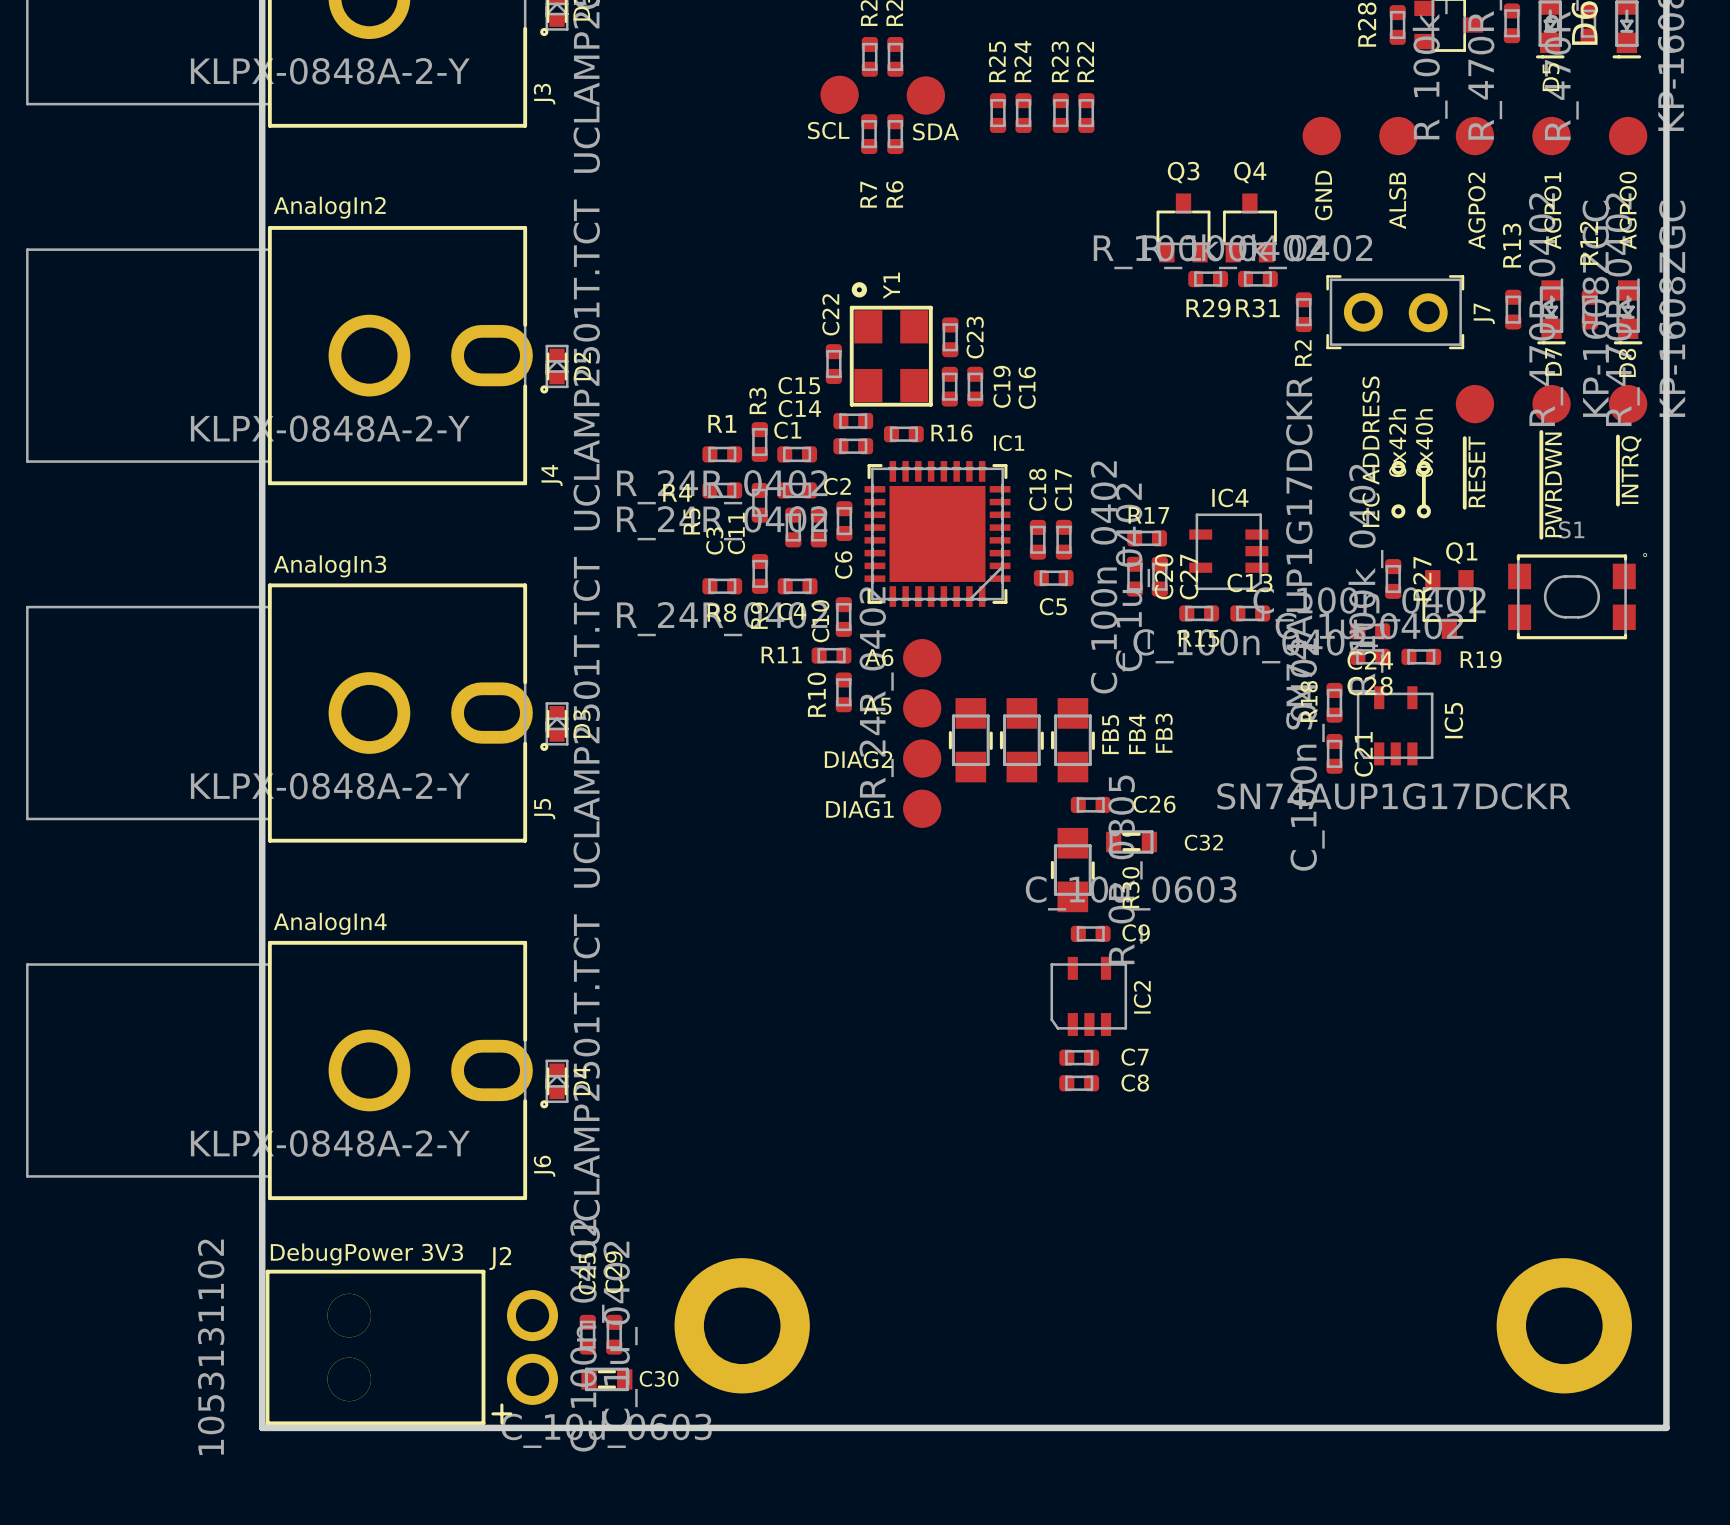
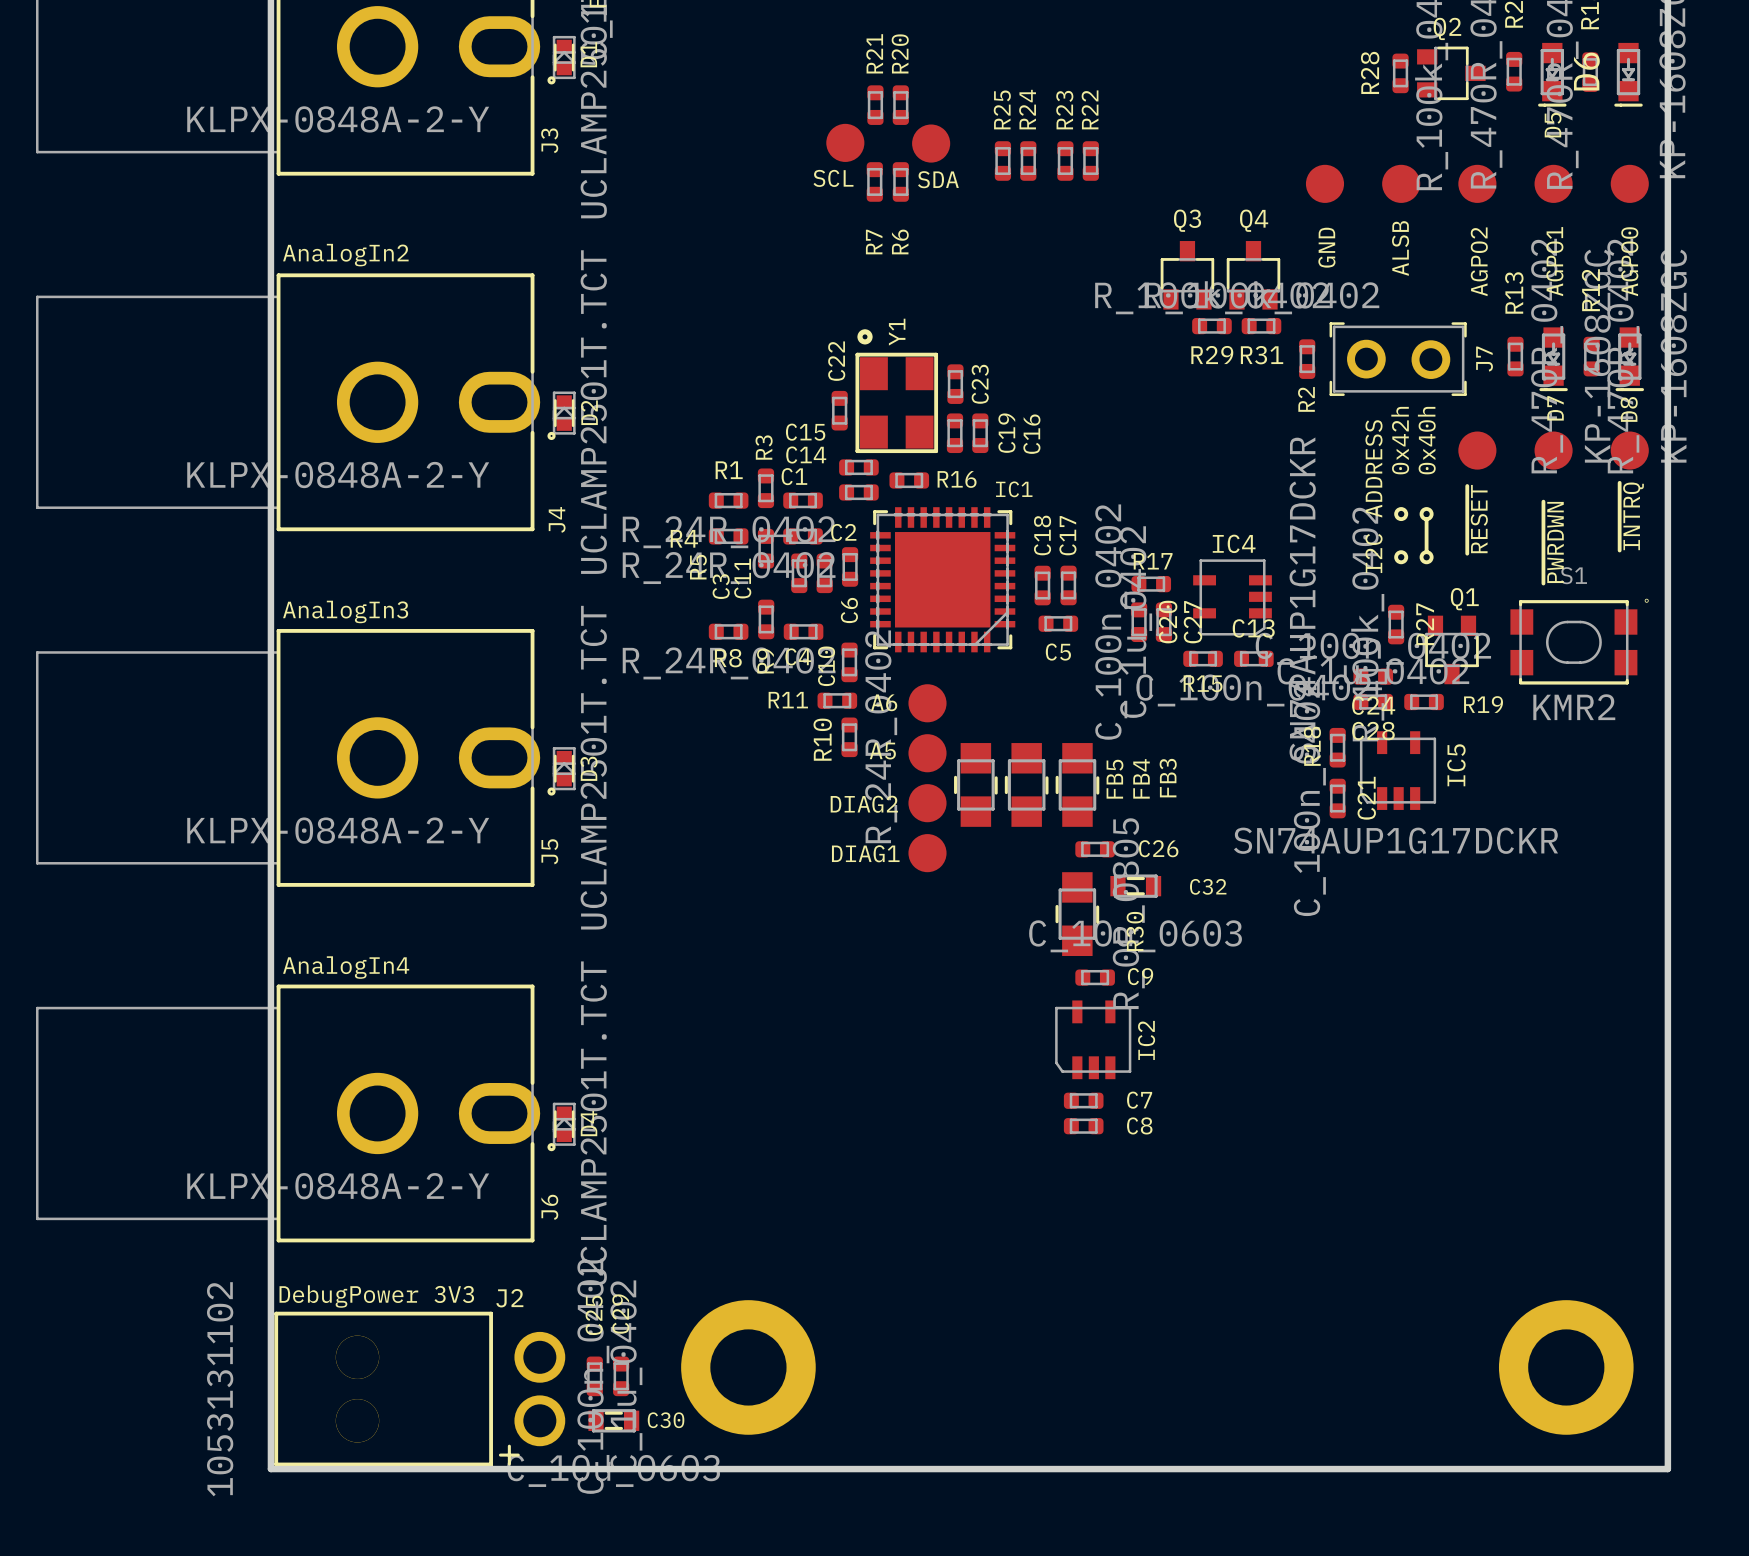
S1 value: none -> KMR2 (1574, 707)

